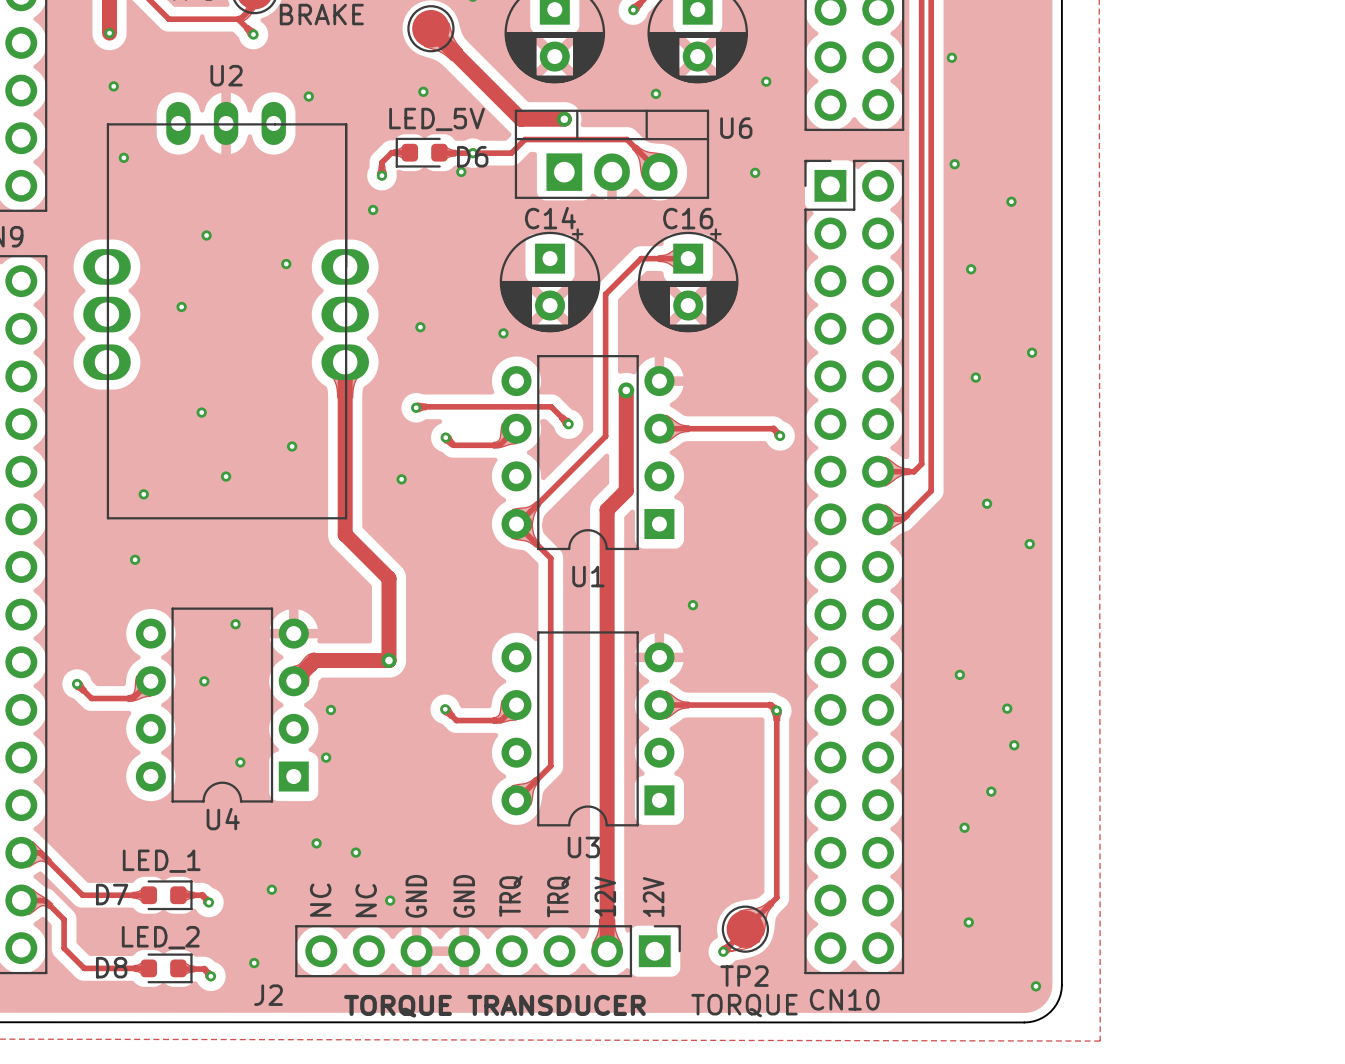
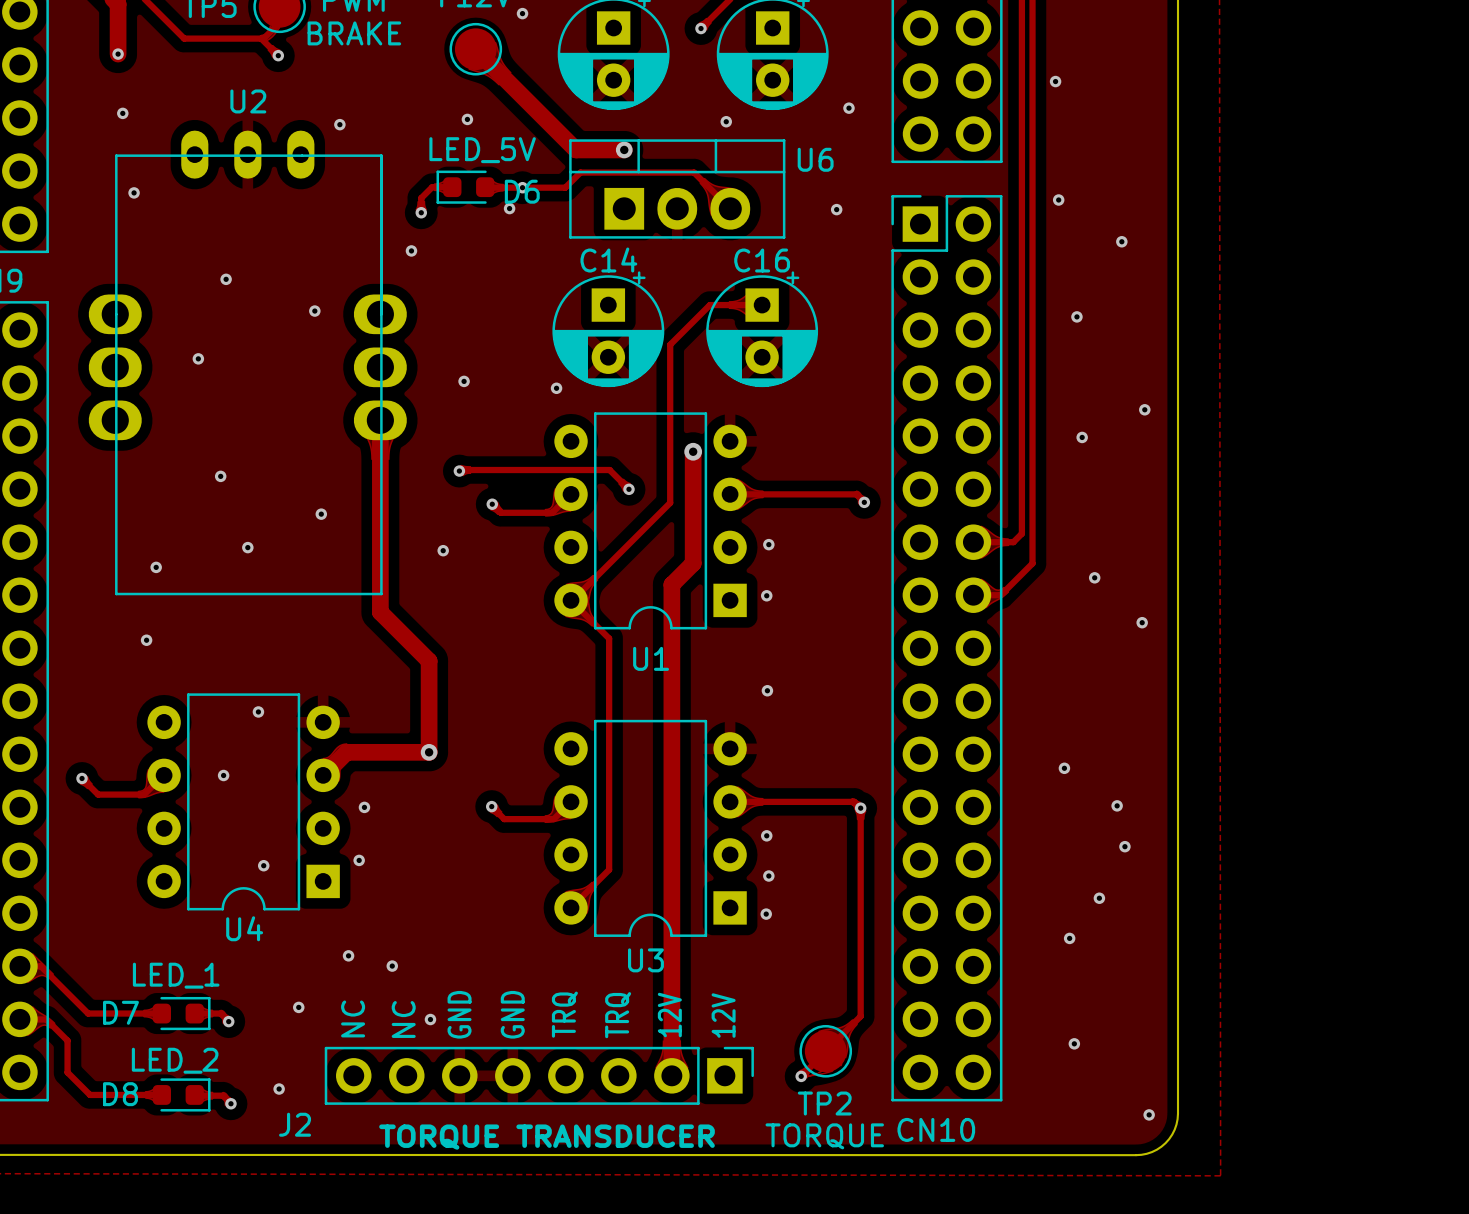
via: none -> (768, 544)
via: none -> (766, 595)
via: none -> (766, 835)
via: none -> (768, 876)
via: none -> (766, 914)

